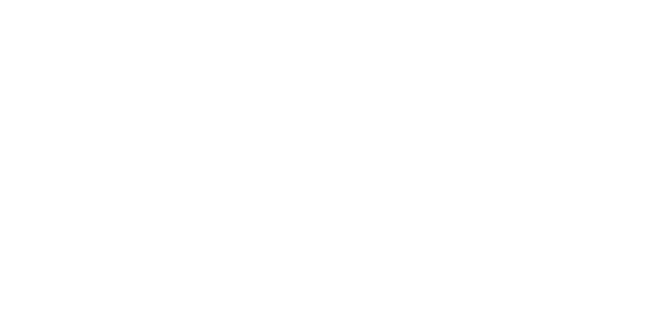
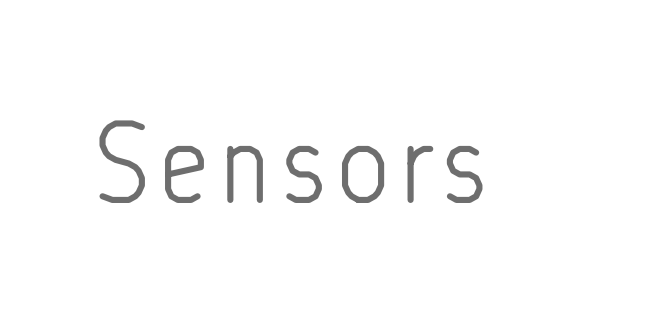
text: none -> Sensors (290, 161)

